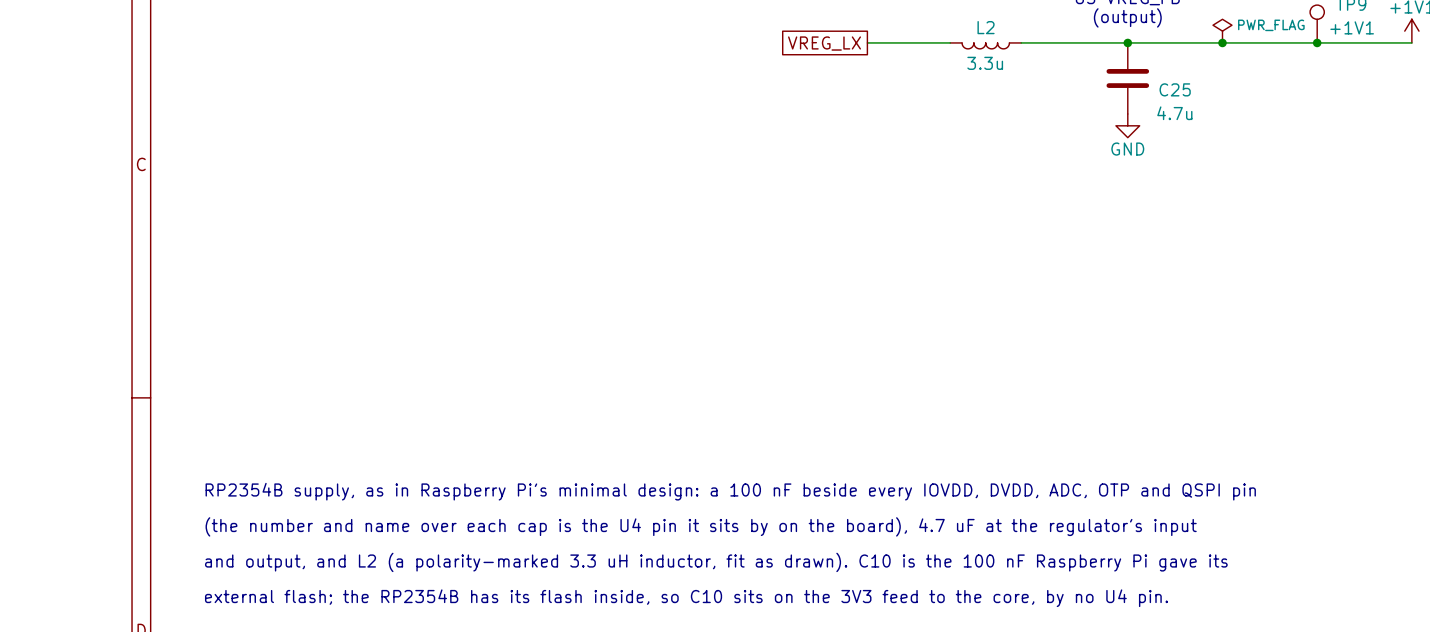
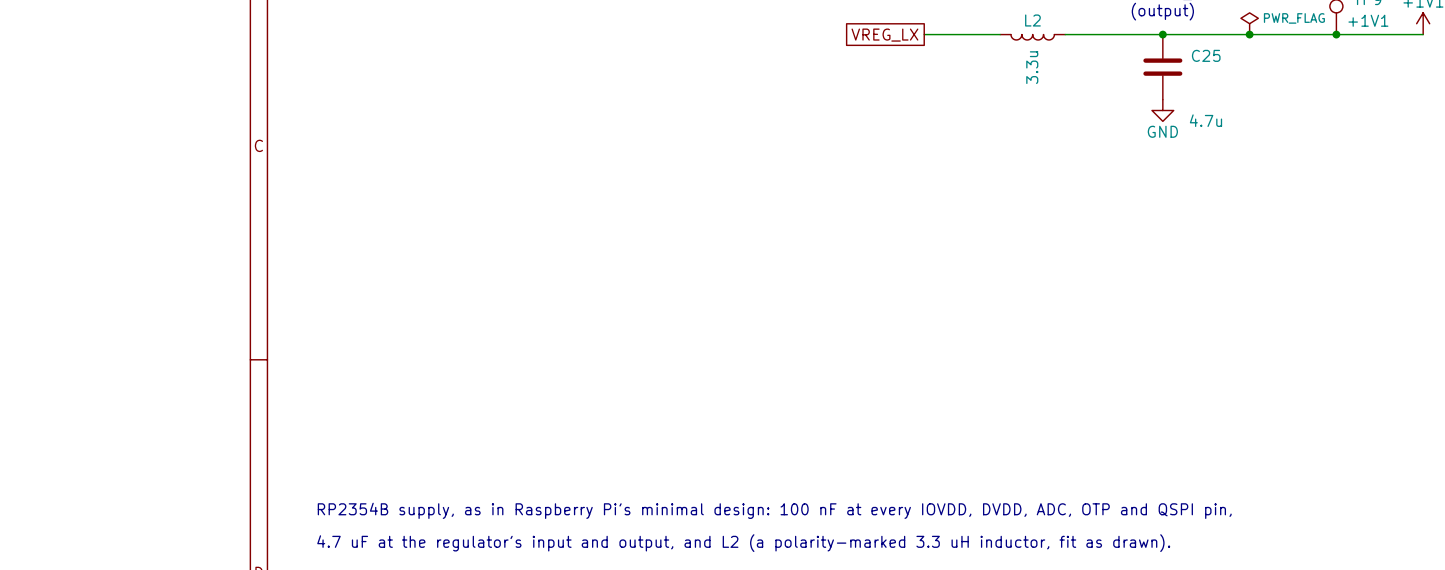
L2 value rotation: 0° (985, 63) -> 90° counterclockwise (1032, 67)
C25 name position: C25 (1175, 89) -> C25 (1206, 55)
C25 value position: 4.7u (1174, 113) -> 4.7u (1205, 120)
text: RP2354B supply, as in Raspberry Pi's minimal design: a 100 nF beside every IOVDD, DVDD, ADC, OTP and QSPI pin (730, 491) -> none
text: (the number and name over each cap is the U4 pin it sits by on the board), 4.7 uF at the regulator's input (701, 526) -> none
text: none -> RP2354B supply, as in Raspberry Pi's minimal design: 100 nF at every IOVDD, DVDD, ADC, OTP and QSPI pin, (774, 510)
text: and output, and L2 (a polarity-marked 3.3 uH inductor, fit as drawn). C10 is the 100 nF Raspberry Pi gave its (716, 562) -> none
text: none -> 4.7 uF at the regulator's input and output, and L2 (a polarity-marked 3.3 uH inductor, fit as drawn). (743, 543)
text: external flash; the RP2354B has its flash inside, so C10 sits on the 3V3 feed to the core, by no U4 pin. (686, 598) -> none

